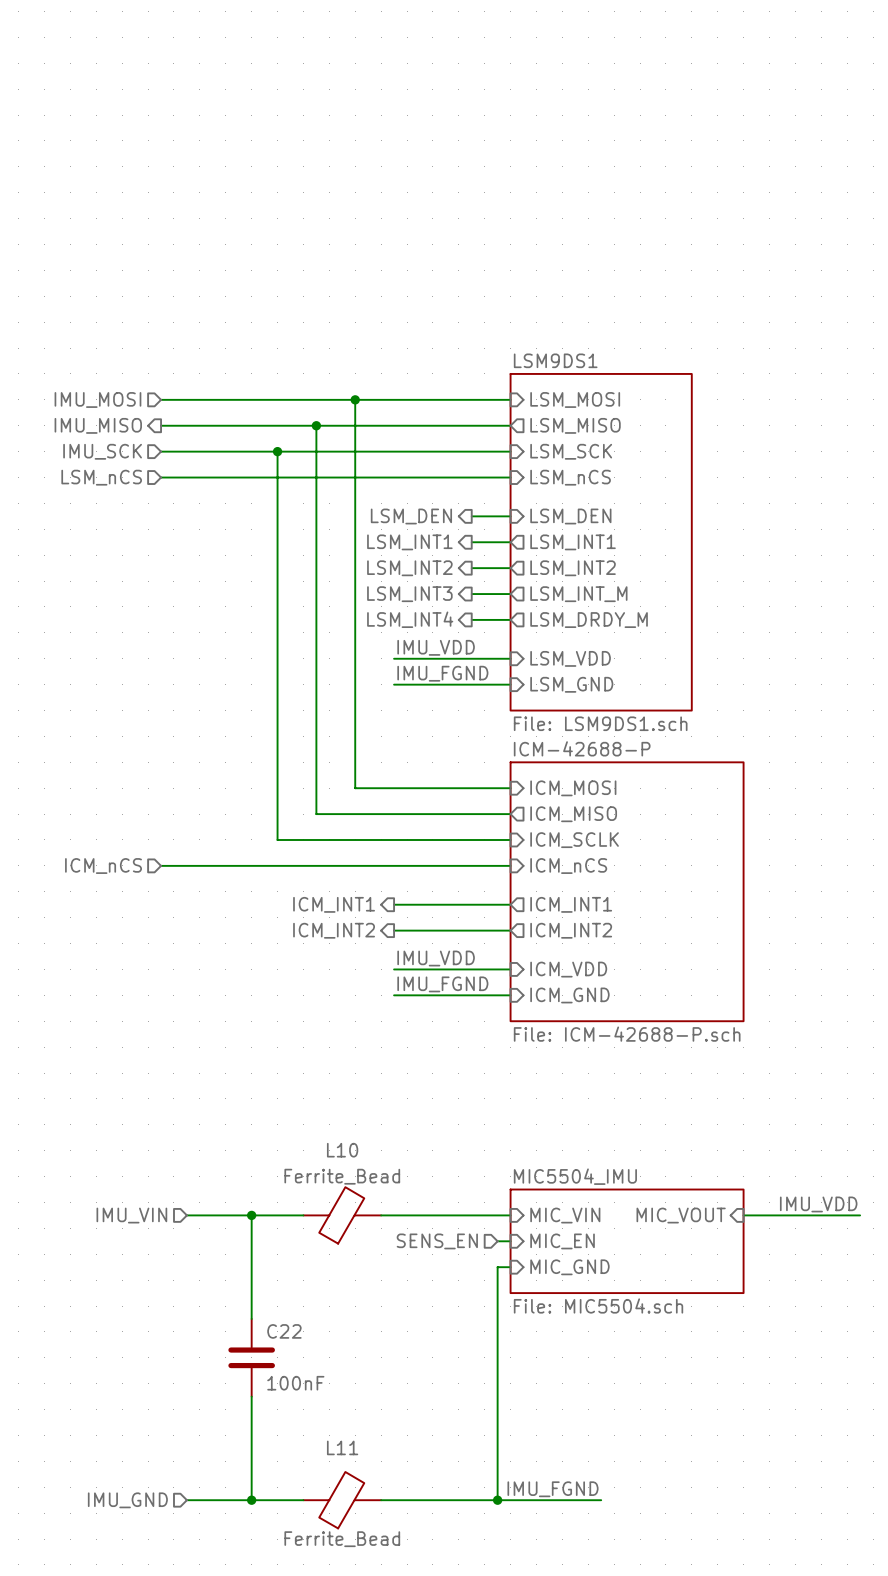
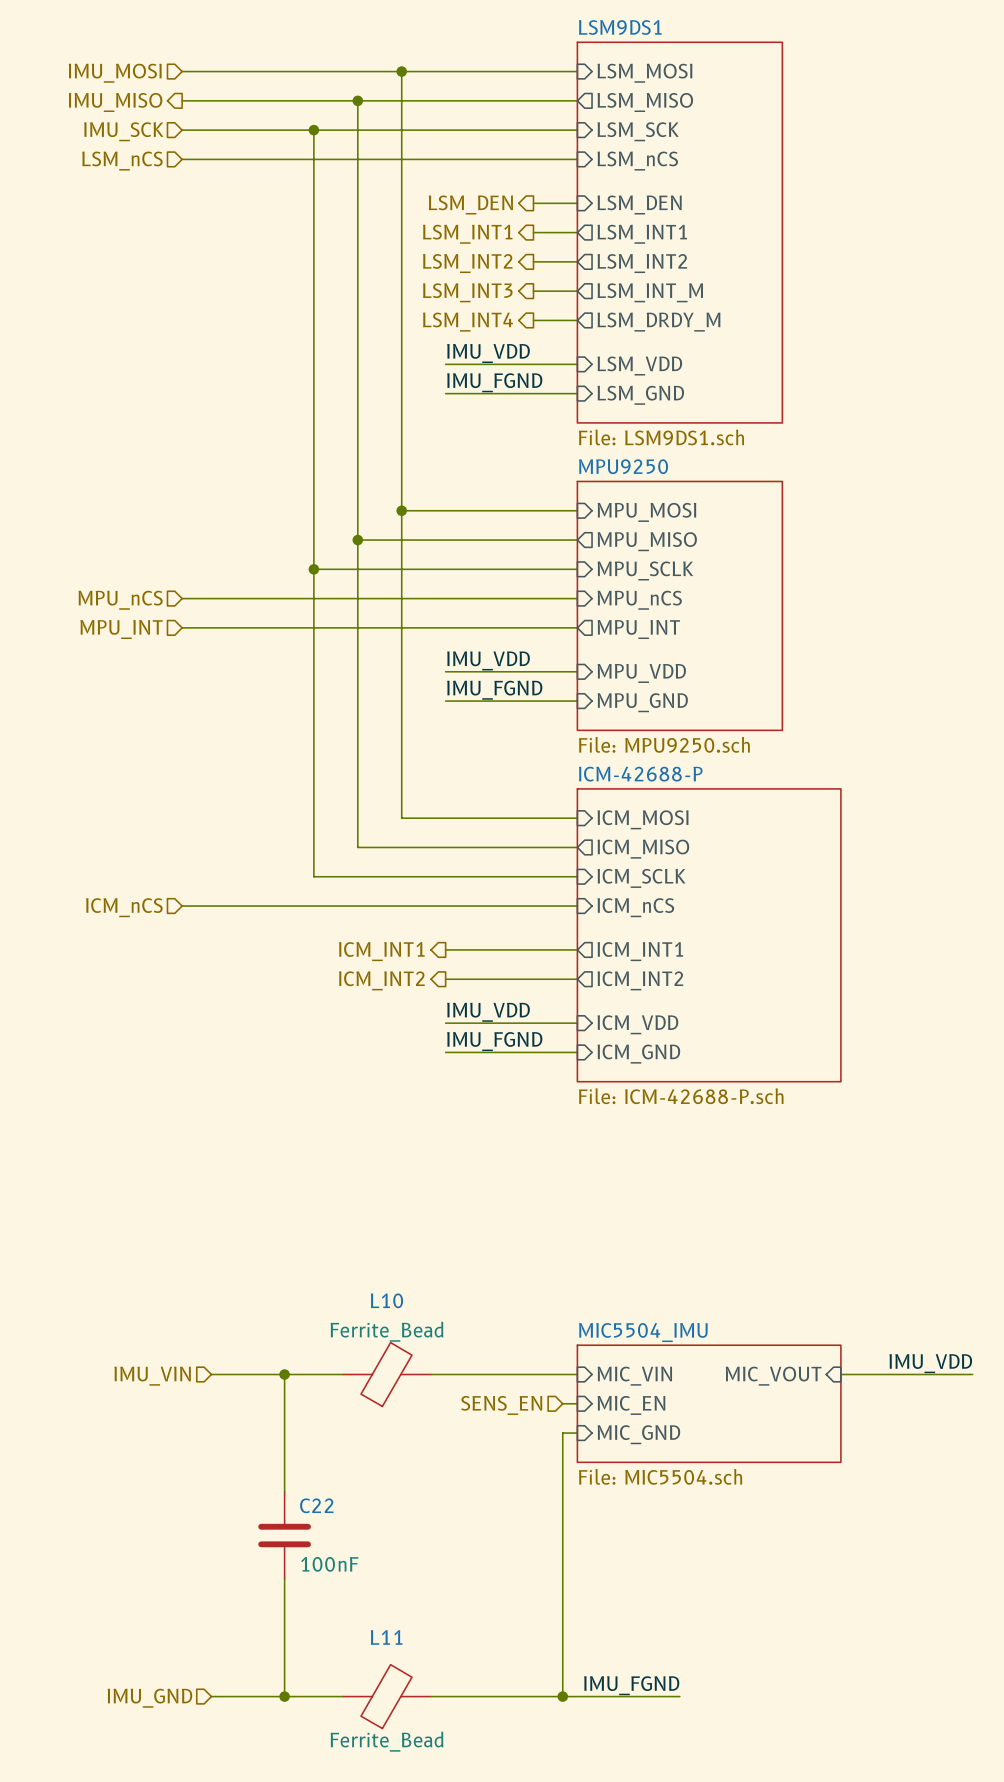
hierarchical label: none -> IMU_MOSI (115, 73)
wire: none -> (182, 71) (577, 71)
wire: none -> (401, 71) (401, 452)
junction: none -> (401, 71)
sheet pin: none -> LSM_MOSI (644, 73)
hierarchical label: none -> IMU_MISO (115, 102)
wire: none -> (182, 100) (577, 100)
wire: none -> (357, 100) (357, 481)
junction: none -> (357, 100)
sheet pin: none -> LSM_MISO (645, 102)
hierarchical label: none -> IMU_SCK (123, 131)
wire: none -> (182, 130) (577, 130)
wire: none -> (313, 130) (313, 510)
junction: none -> (313, 130)
sheet pin: none -> LSM_SCK (638, 131)
wire: none -> (182, 159) (577, 159)
hierarchical label: none -> LSM_nCS (122, 161)
sheet pin: none -> LSM_nCS (637, 161)
hierarchical label: none -> LSM_DEN (470, 204)
wire: none -> (533, 203) (577, 203)
sheet pin: none -> LSM_DEN (639, 204)
hierarchical label: none -> LSM_INT1 (467, 234)
wire: none -> (533, 232) (577, 232)
sheet pin: none -> LSM_INT1 (642, 234)
hierarchical label: none -> LSM_INT2 (467, 263)
wire: none -> (533, 261) (577, 261)
sheet pin: none -> LSM_INT2 (642, 263)
hierarchical label: none -> LSM_INT3 (467, 292)
wire: none -> (533, 291) (577, 291)
sheet pin: none -> LSM_INT_M (650, 292)
hierarchical label: none -> LSM_INT4 (467, 322)
sheet pin: none -> LSM_DRDY_M (658, 322)
label: none -> IMU_VDD (488, 353)
wire: none -> (445, 364) (577, 364)
sheet pin: none -> LSM_VDD (639, 366)
label: none -> IMU_FGND (494, 382)
wire: none -> (445, 393) (577, 393)
sheet pin: none -> LSM_GND (640, 395)
hierarchical label: IMU_MOSI (97, 399) -> none
wire: (161, 399) (510, 399) -> (182, 598) (577, 598)
junction: (355, 399) -> none
sheet pin: LSM_MOSI (575, 399) -> none
hierarchical label: IMU_MISO (98, 425) -> none
wire: (161, 425) (510, 425) -> (182, 627) (577, 627)
junction: (316, 425) -> none
sheet pin: LSM_MISO (575, 425) -> none
hierarchical label: IMU_SCK (102, 451) -> none
wire: (161, 451) (355, 451) -> none
junction: (277, 451) -> none
junction: none -> (401, 510)
sheet pin: LSM_SCK (571, 451) -> MPU_MOSI (646, 512)
hierarchical label: LSM_nCS (101, 477) -> none
wire: (161, 477) (316, 477) -> none
junction: none -> (357, 540)
sheet pin shape: input (570, 477) -> output (647, 541)
sheet pin: LSM_nCS (570, 477) -> MPU_MISO (647, 541)
wire: none -> (313, 569) (577, 569)
junction: none -> (313, 569)
sheet pin: none -> MPU_SCLK (645, 570)
hierarchical label: LSM_DEN (411, 516) -> none
wire: (471, 516) (510, 516) -> (533, 320) (577, 320)
sheet pin: LSM_DEN (570, 516) -> none
hierarchical label: none -> MPU_nCS (120, 600)
sheet pin: none -> MPU_nCS (639, 600)
sheet MPU9250: none -> File: MPU9250.sch (679, 605)
hierarchical label: LSM_INT1 (409, 542) -> none
wire: (471, 542) (510, 542) -> none
sheet pin: LSM_INT1 (573, 542) -> none
sheet LSM9DS1 position: (601, 542) -> (679, 232)
hierarchical label: none -> MPU_INT (121, 629)
sheet pin: none -> MPU_INT (638, 629)
hierarchical label: LSM_INT2 (409, 568) -> none
wire: (471, 568) (510, 568) -> none
sheet pin: LSM_INT2 (573, 568) -> none
wire: none -> (445, 671) (533, 671)
hierarchical label: LSM_INT3 (409, 594) -> none
sheet pin shape: output (578, 594) -> input (641, 673)
sheet pin: LSM_INT_M (578, 594) -> MPU_VDD (641, 673)
wire: none -> (445, 701) (533, 701)
hierarchical label: LSM_INT4 (410, 619) -> none
sheet pin shape: output (589, 620) -> input (642, 702)
sheet pin: LSM_DRDY_M (589, 620) -> MPU_GND (642, 702)
label position: IMU_VDD (436, 647) -> IMU_VDD (488, 660)
wire: (394, 658) (510, 658) -> none
sheet pin: LSM_VDD (570, 658) -> none
label position: IMU_FGND (442, 673) -> IMU_FGND (494, 690)
wire: (394, 684) (510, 684) -> none
sheet pin: LSM_GND (571, 684) -> none
wire: (355, 723) (355, 788) (510, 788) -> (401, 818) (577, 818)
wire: (316, 749) (316, 814) (510, 814) -> (357, 847) (577, 847)
wire: (277, 775) (277, 839) (394, 839) -> (313, 876) (577, 876)
sheet pin: none -> ICM_SCLK (641, 878)
sheet pin position: ICM_MOSI (573, 788) -> ICM_MOSI (642, 819)
wire: none -> (182, 906) (577, 906)
sheet pin: none -> ICM_nCS (635, 907)
sheet pin position: ICM_MISO (573, 814) -> ICM_MISO (643, 849)
sheet pin shape: input (574, 840) -> output (640, 951)
sheet pin: ICM_SCLK (574, 840) -> ICM_INT1 (640, 951)
wire: (161, 865) (394, 865) -> none
hierarchical label position: ICM_nCS (103, 866) -> ICM_nCS (124, 907)
sheet pin shape: input (568, 866) -> output (640, 980)
sheet pin: ICM_nCS (568, 866) -> ICM_INT2 (640, 980)
sheet ICM-42688-P position: (627, 891) -> (709, 935)
hierarchical label position: ICM_INT1 (334, 904) -> ICM_INT1 (381, 951)
sheet pin shape: output (571, 904) -> input (637, 1024)
sheet pin: ICM_INT1 (571, 904) -> ICM_VDD (637, 1024)
hierarchical label position: ICM_INT2 (334, 930) -> ICM_INT2 (381, 980)
sheet pin shape: output (571, 930) -> input (638, 1054)
sheet pin: ICM_INT2 (571, 930) -> ICM_GND (638, 1054)
label position: IMU_VDD (436, 958) -> IMU_VDD (488, 1012)
wire: (394, 969) (510, 969) -> none
sheet pin: ICM_VDD (568, 969) -> none
label position: IMU_FGND (442, 984) -> IMU_FGND (494, 1041)
wire: (394, 995) (510, 995) -> none
sheet pin: ICM_GND (569, 995) -> none

